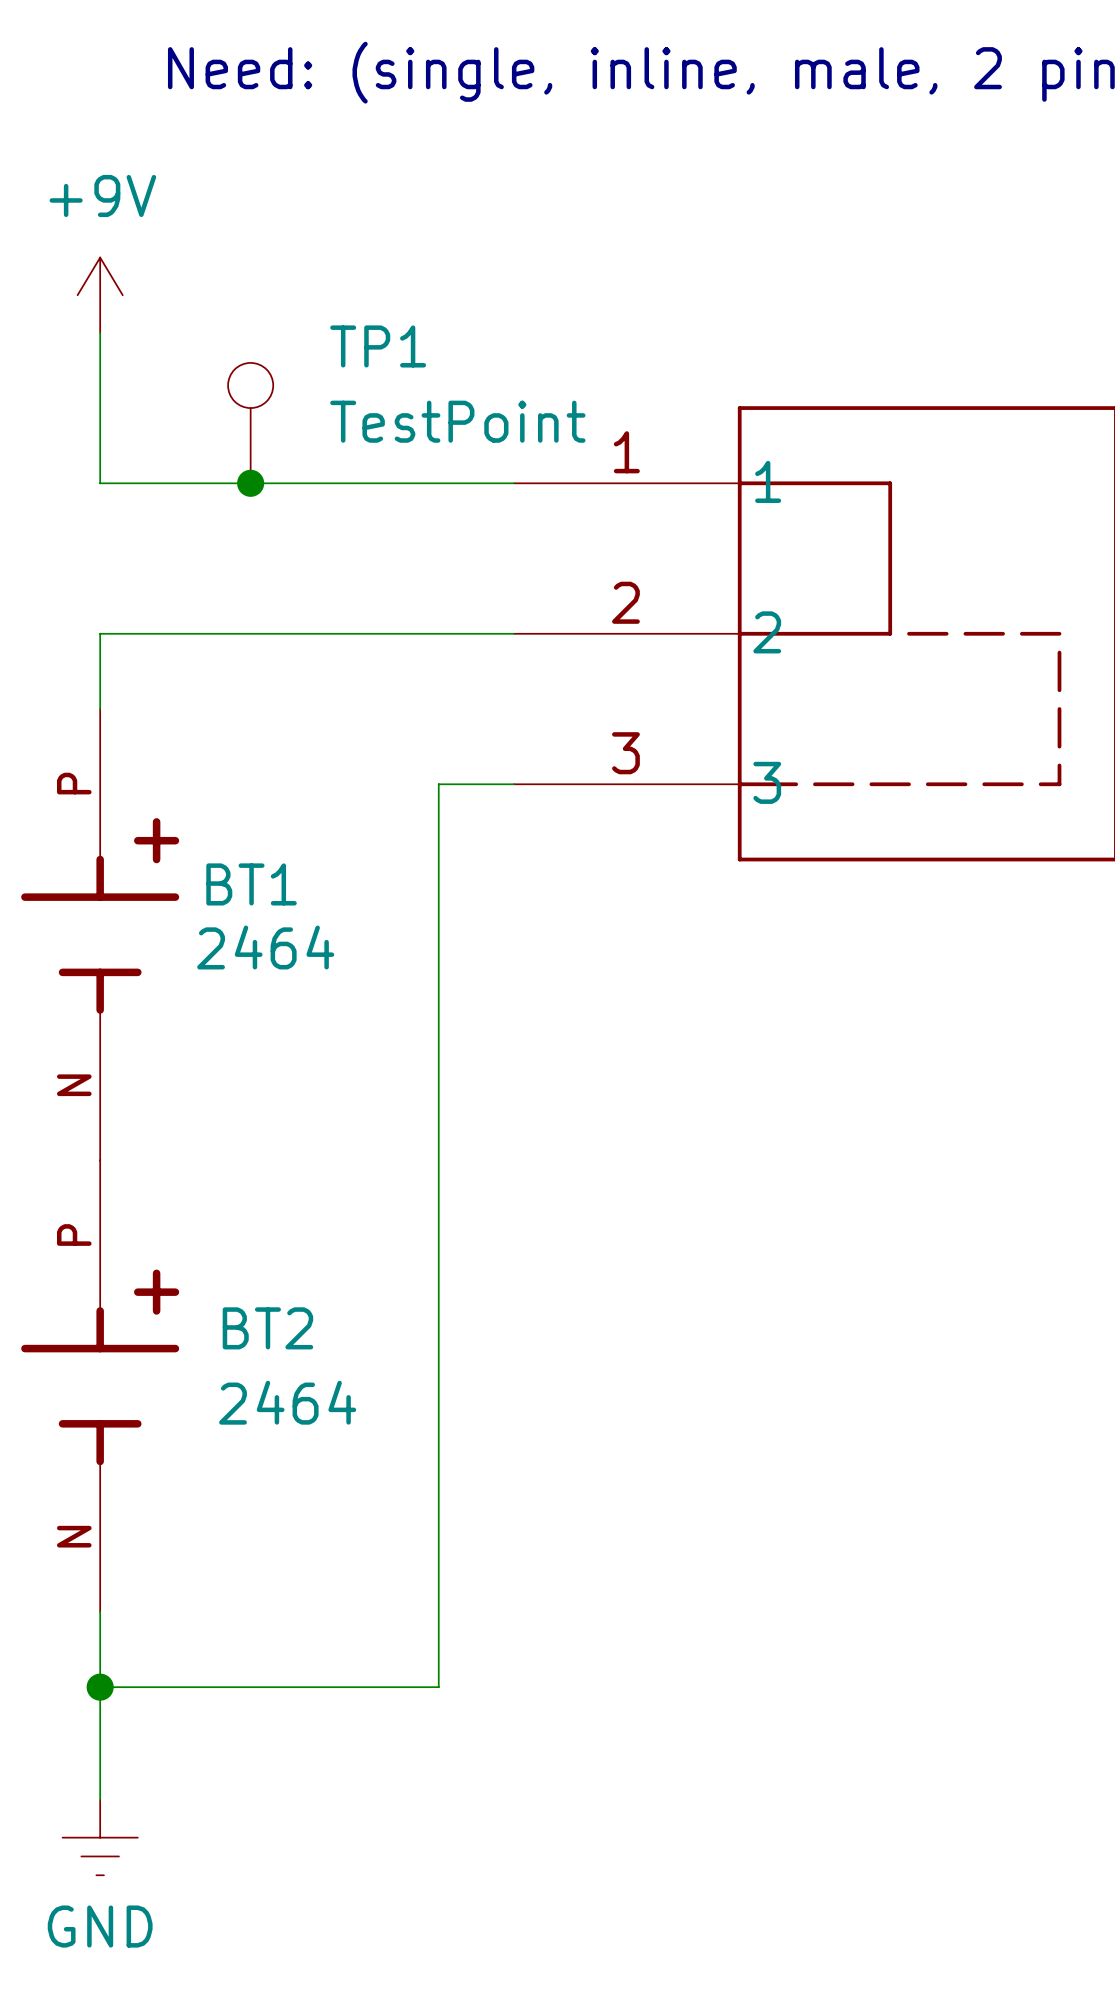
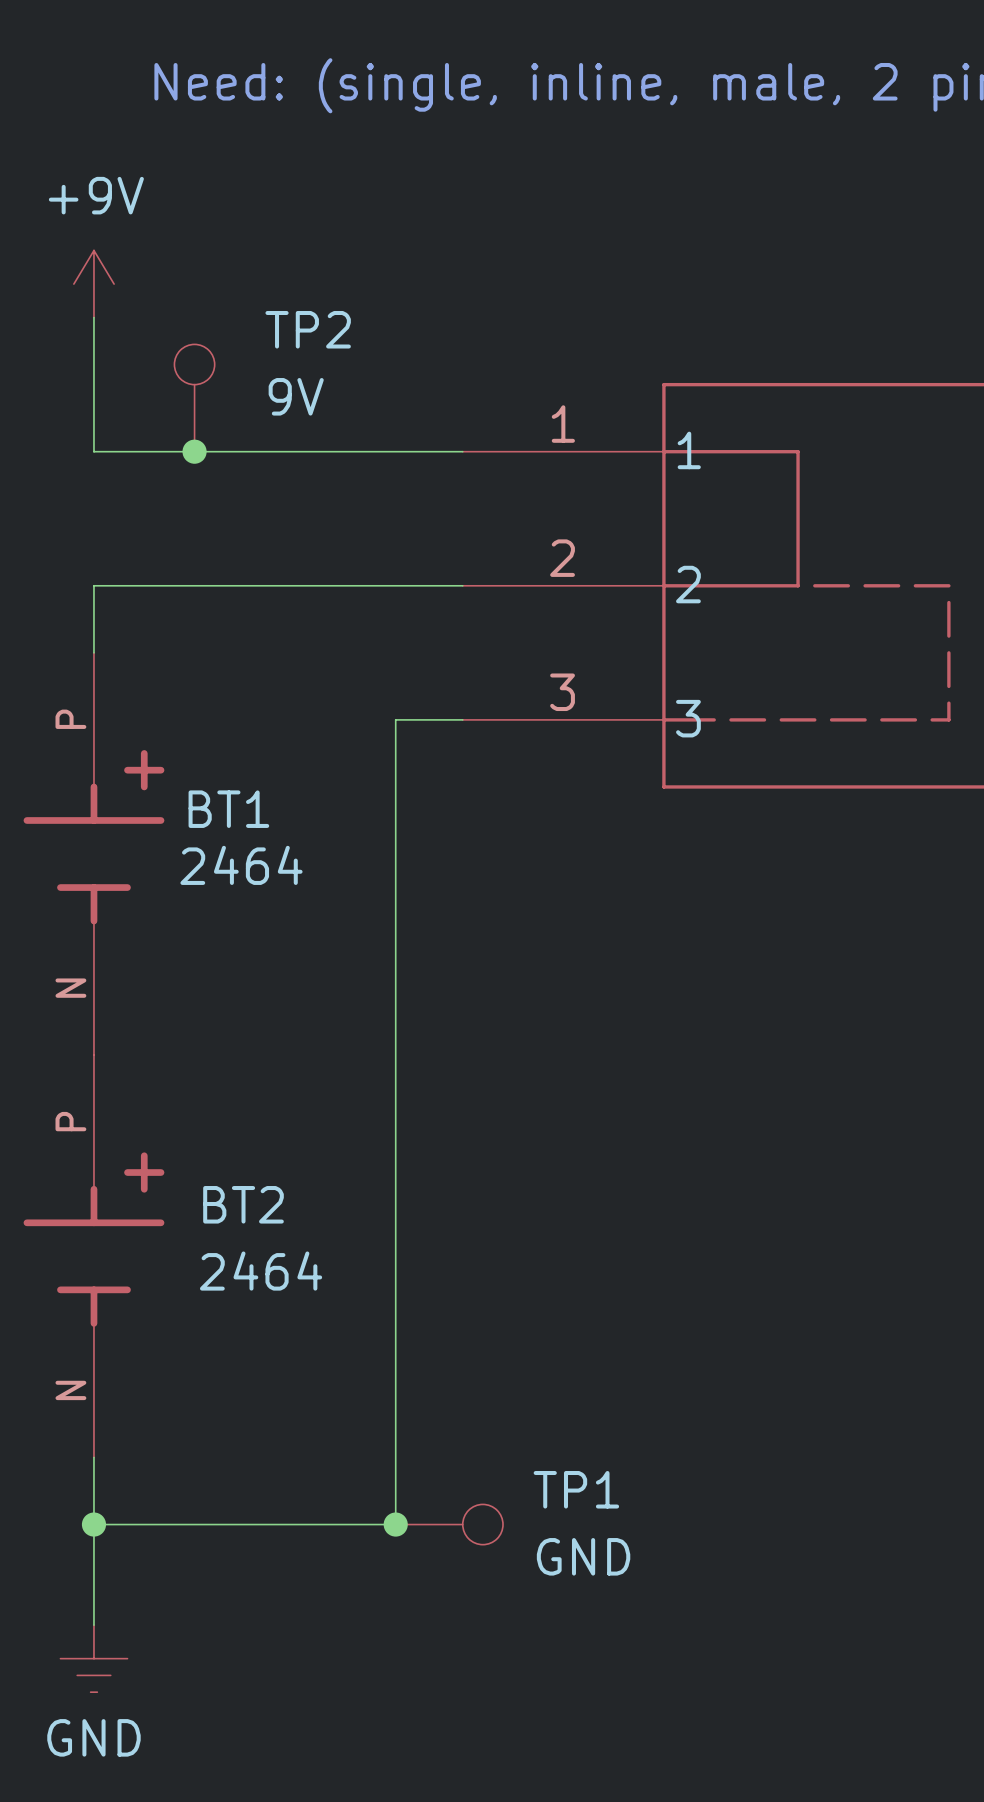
TP1 rotation: 0° (250, 385) -> 90° clockwise (482, 1524)
TP1 value: TestPoint (457, 421) -> GND (583, 1556)
TP2: none -> 9V (194, 398)
TP1 position: (250, 423) -> (449, 1524)
junction position: (250, 483) -> (194, 451)
junction: none -> (395, 1524)

